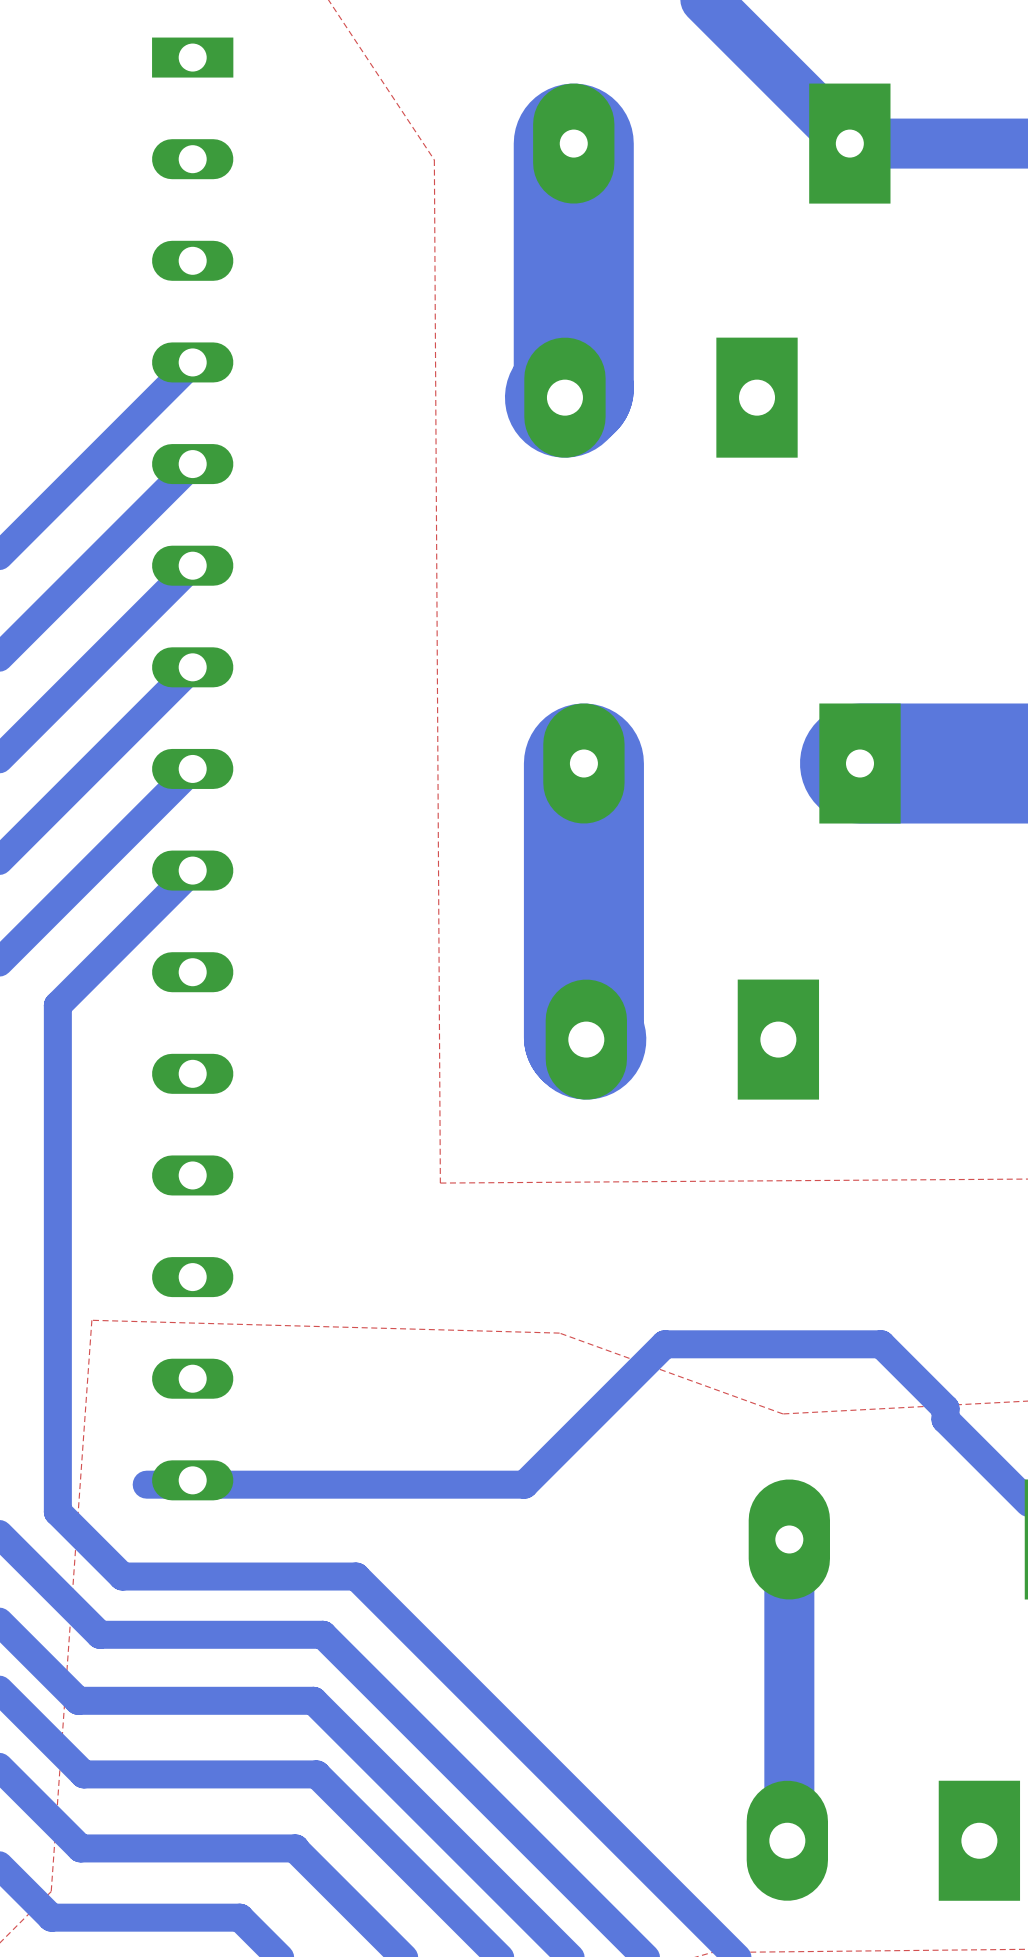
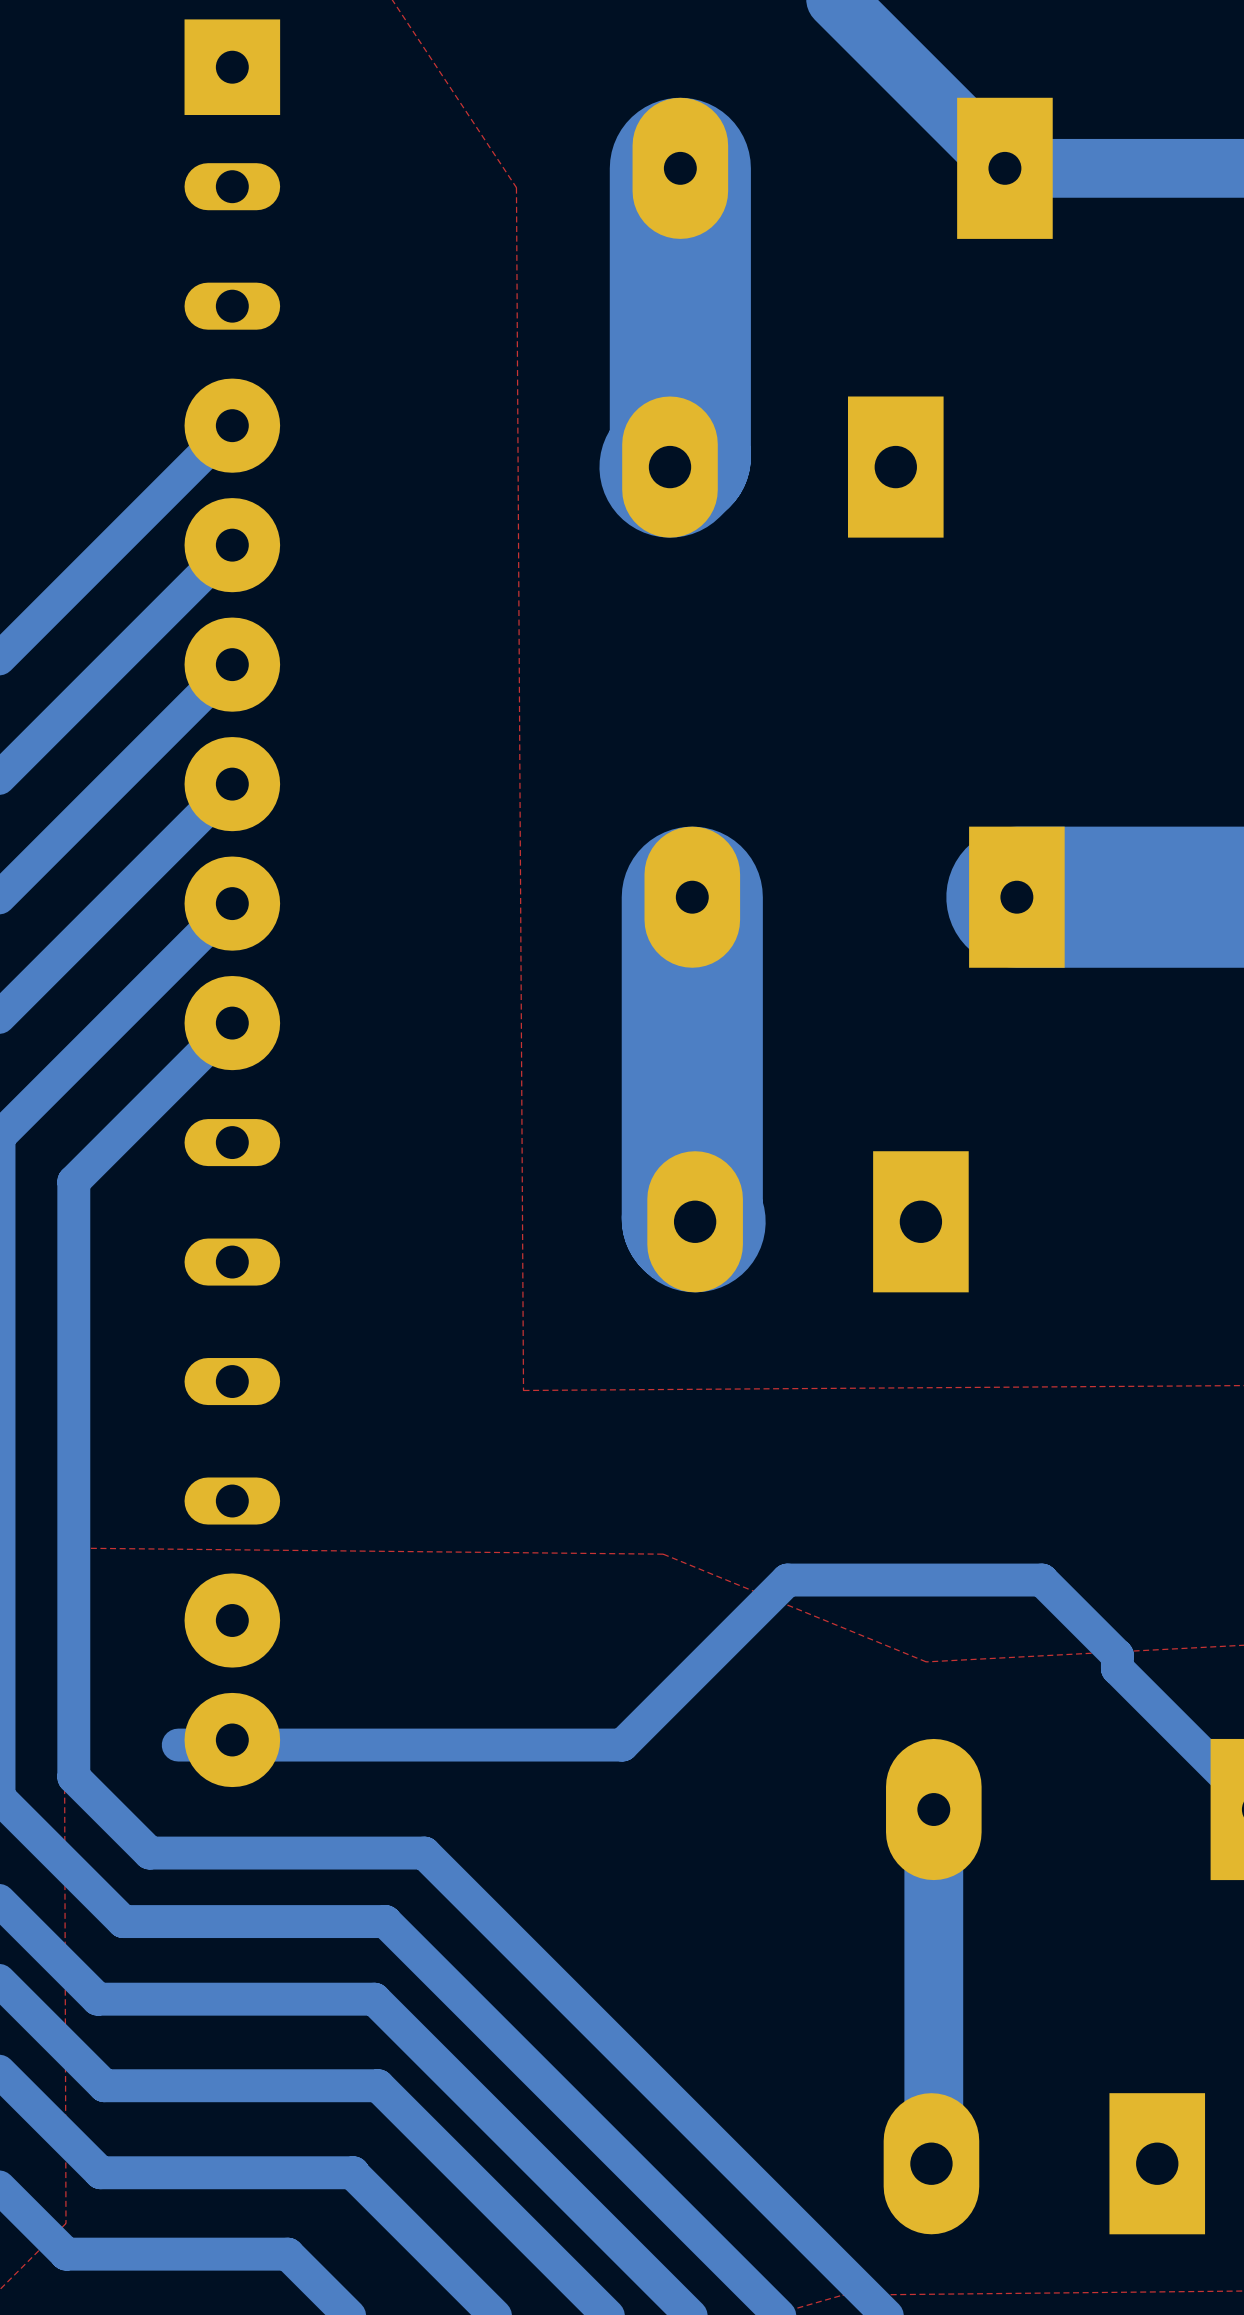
part footprint: [152, 37, 234, 1501] -> [184, 19, 281, 1788]
top zone outline: (782, 1413) (559, 1333) (91, 1320) (51, 1891) -> (926, 1661) (663, 1554) (63, 1548) (65, 2223)

